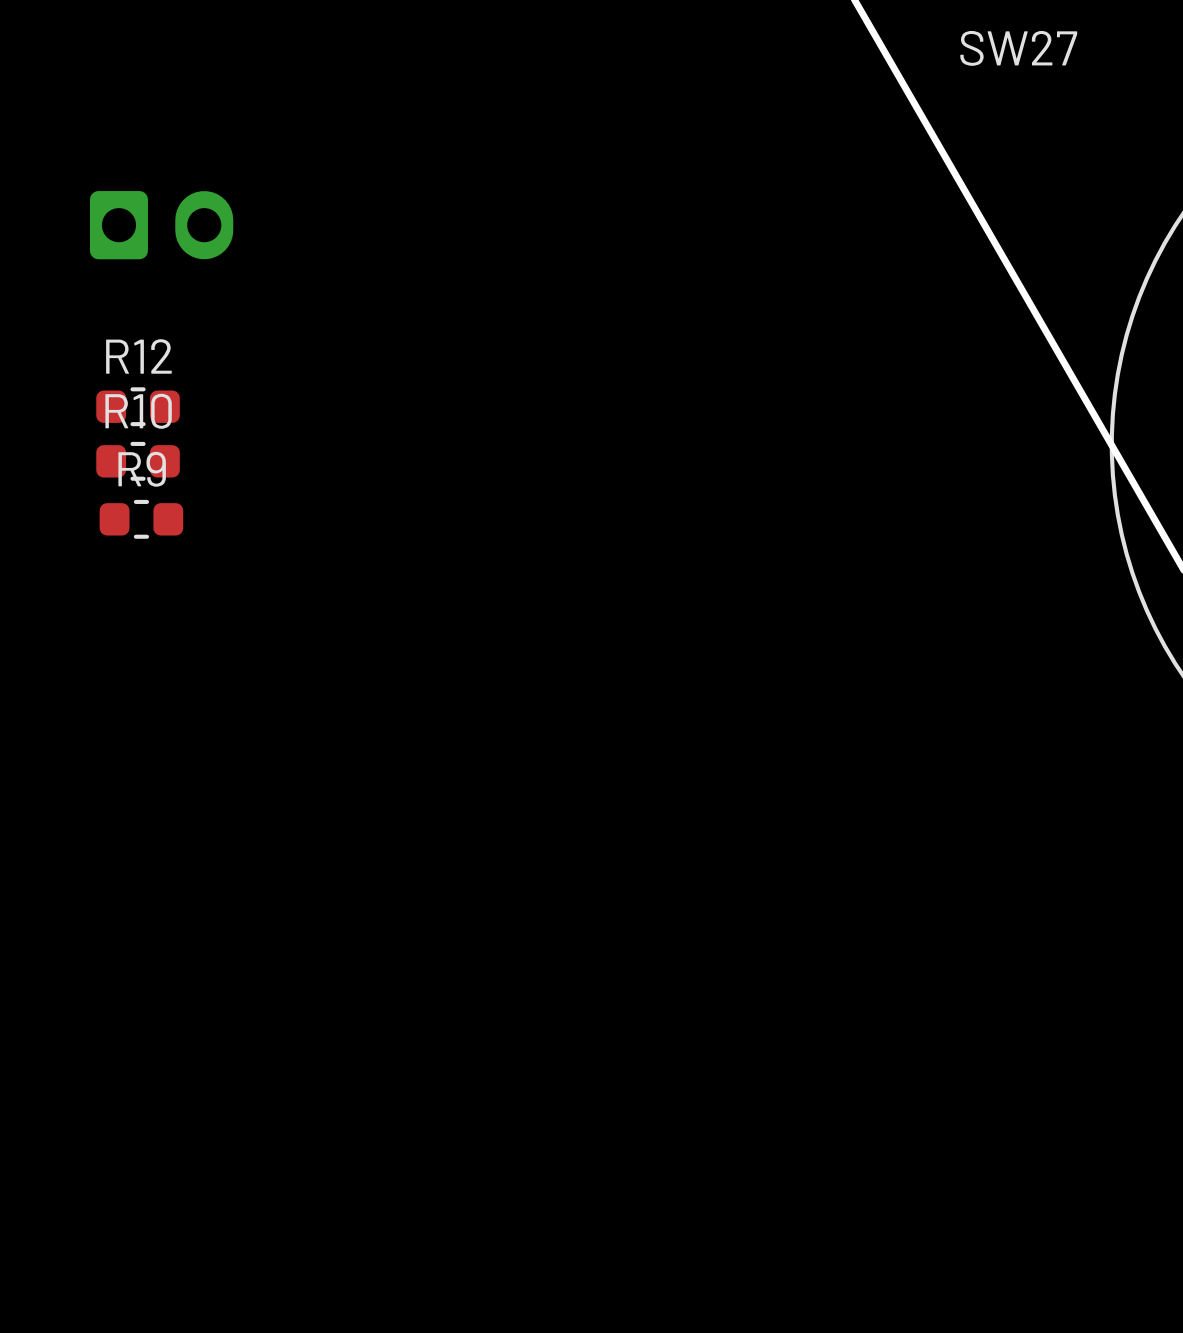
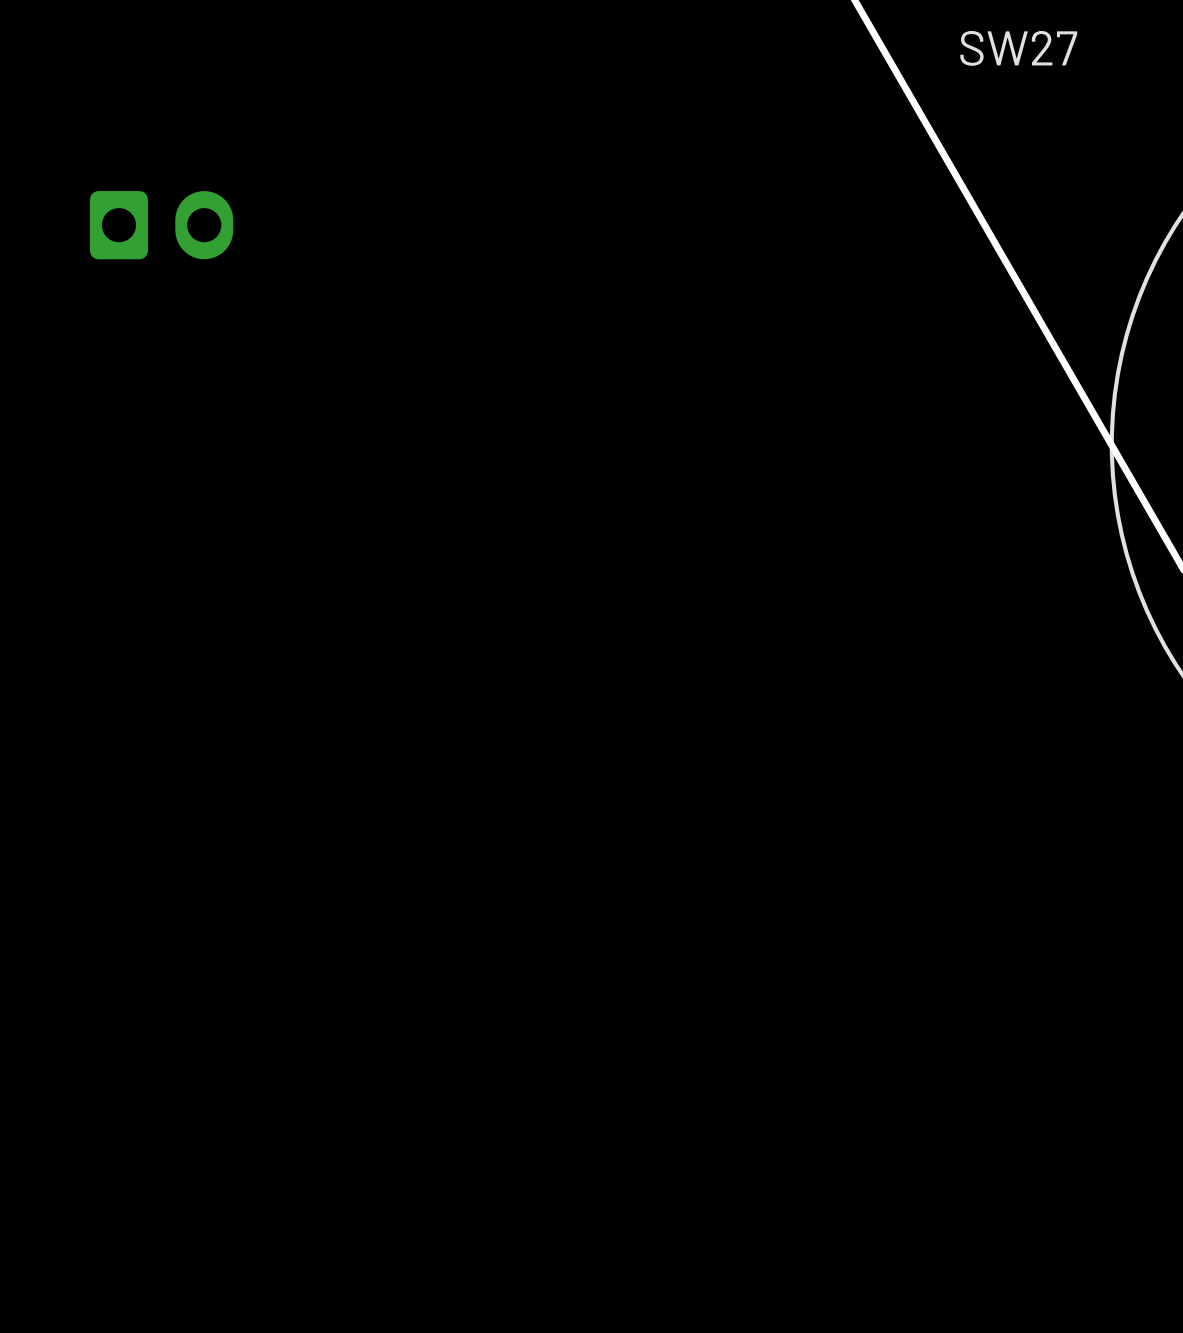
R12: (138, 406) -> none
R10: (138, 461) -> none
R9: (141, 519) -> none

